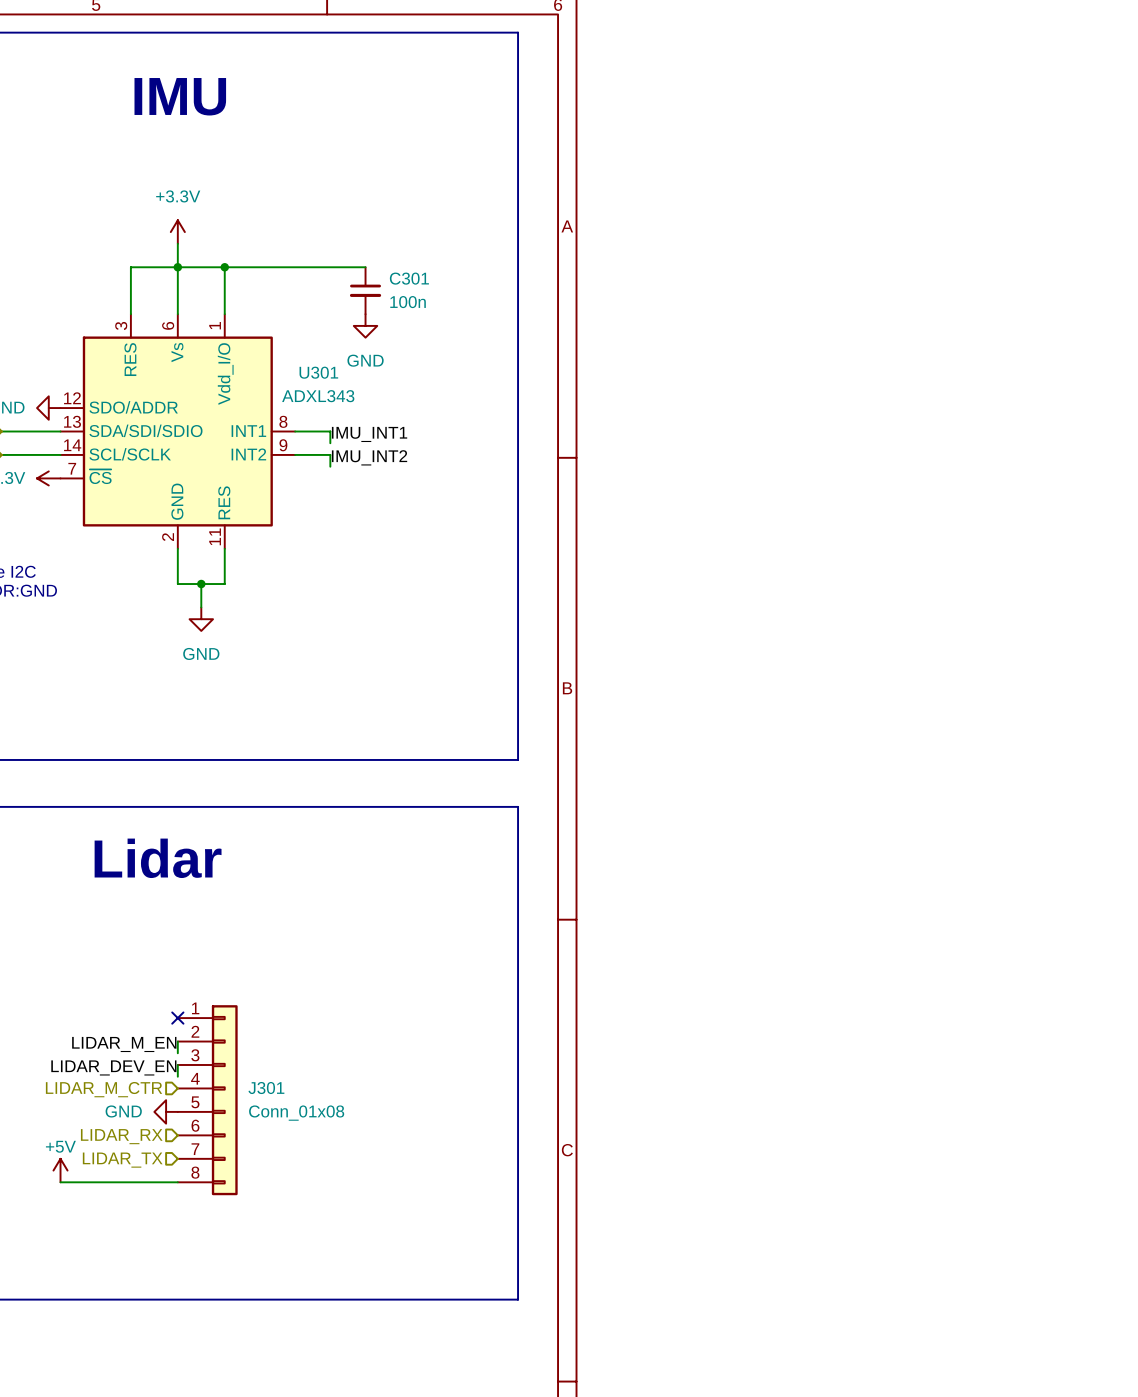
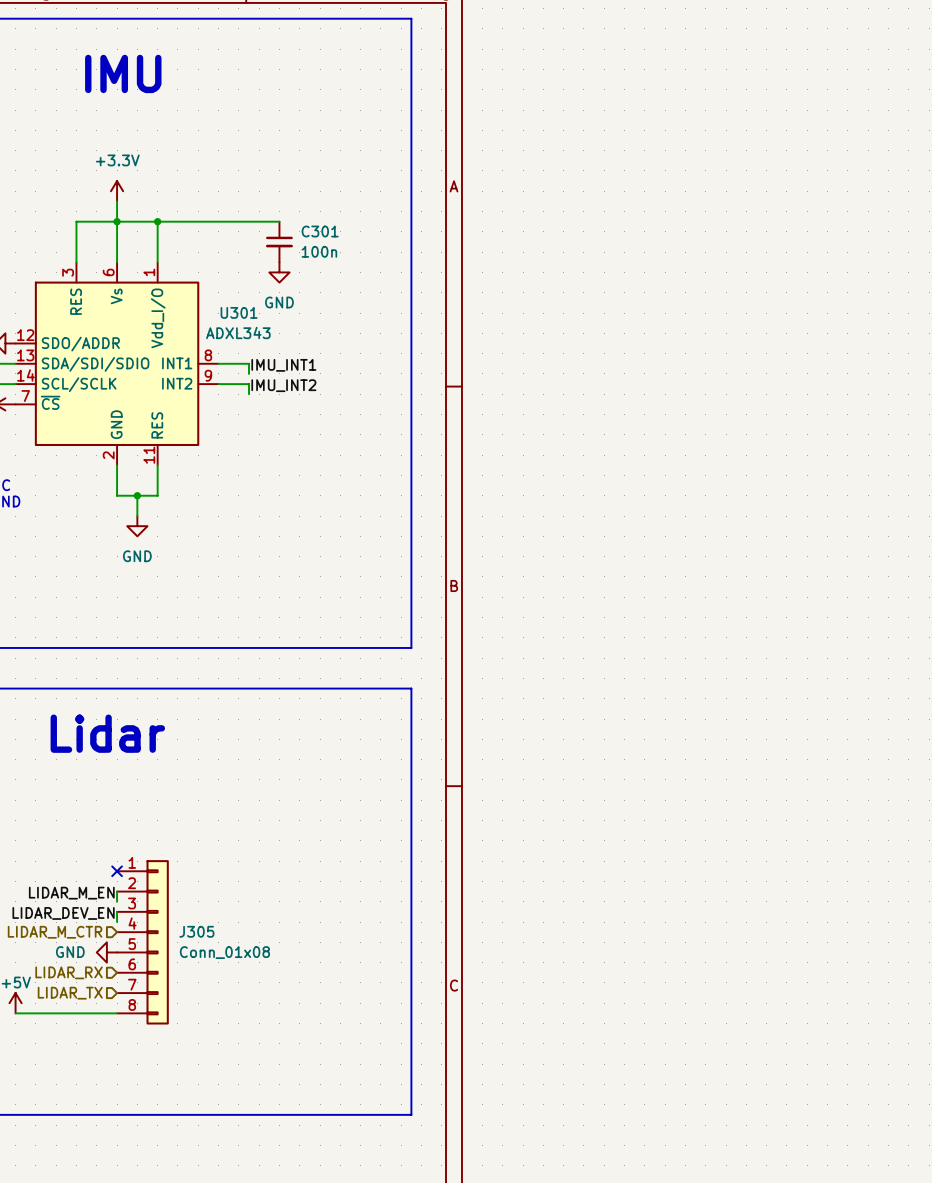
J301 name: J301 (266, 1088) -> J305 (196, 931)

